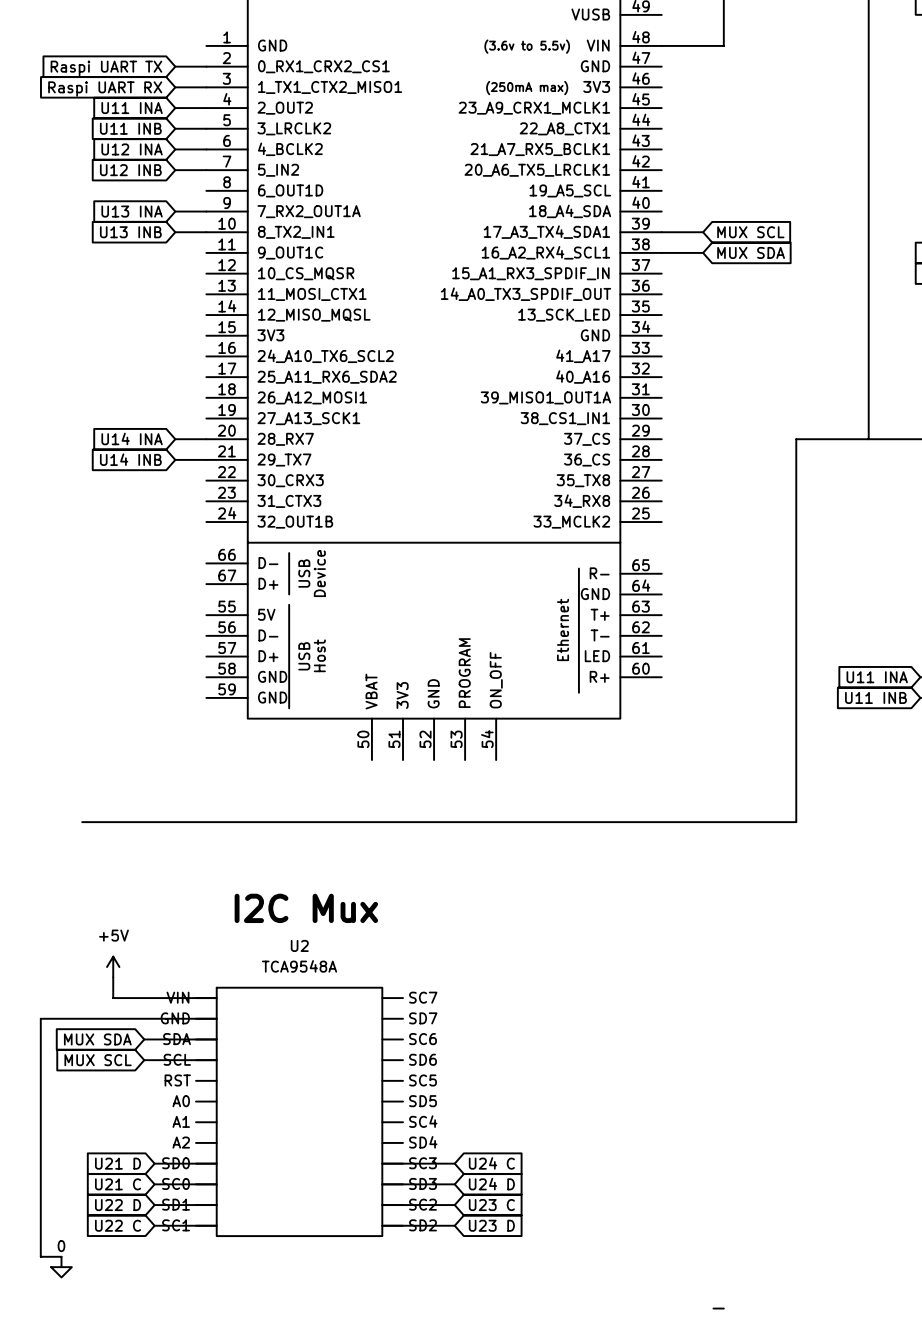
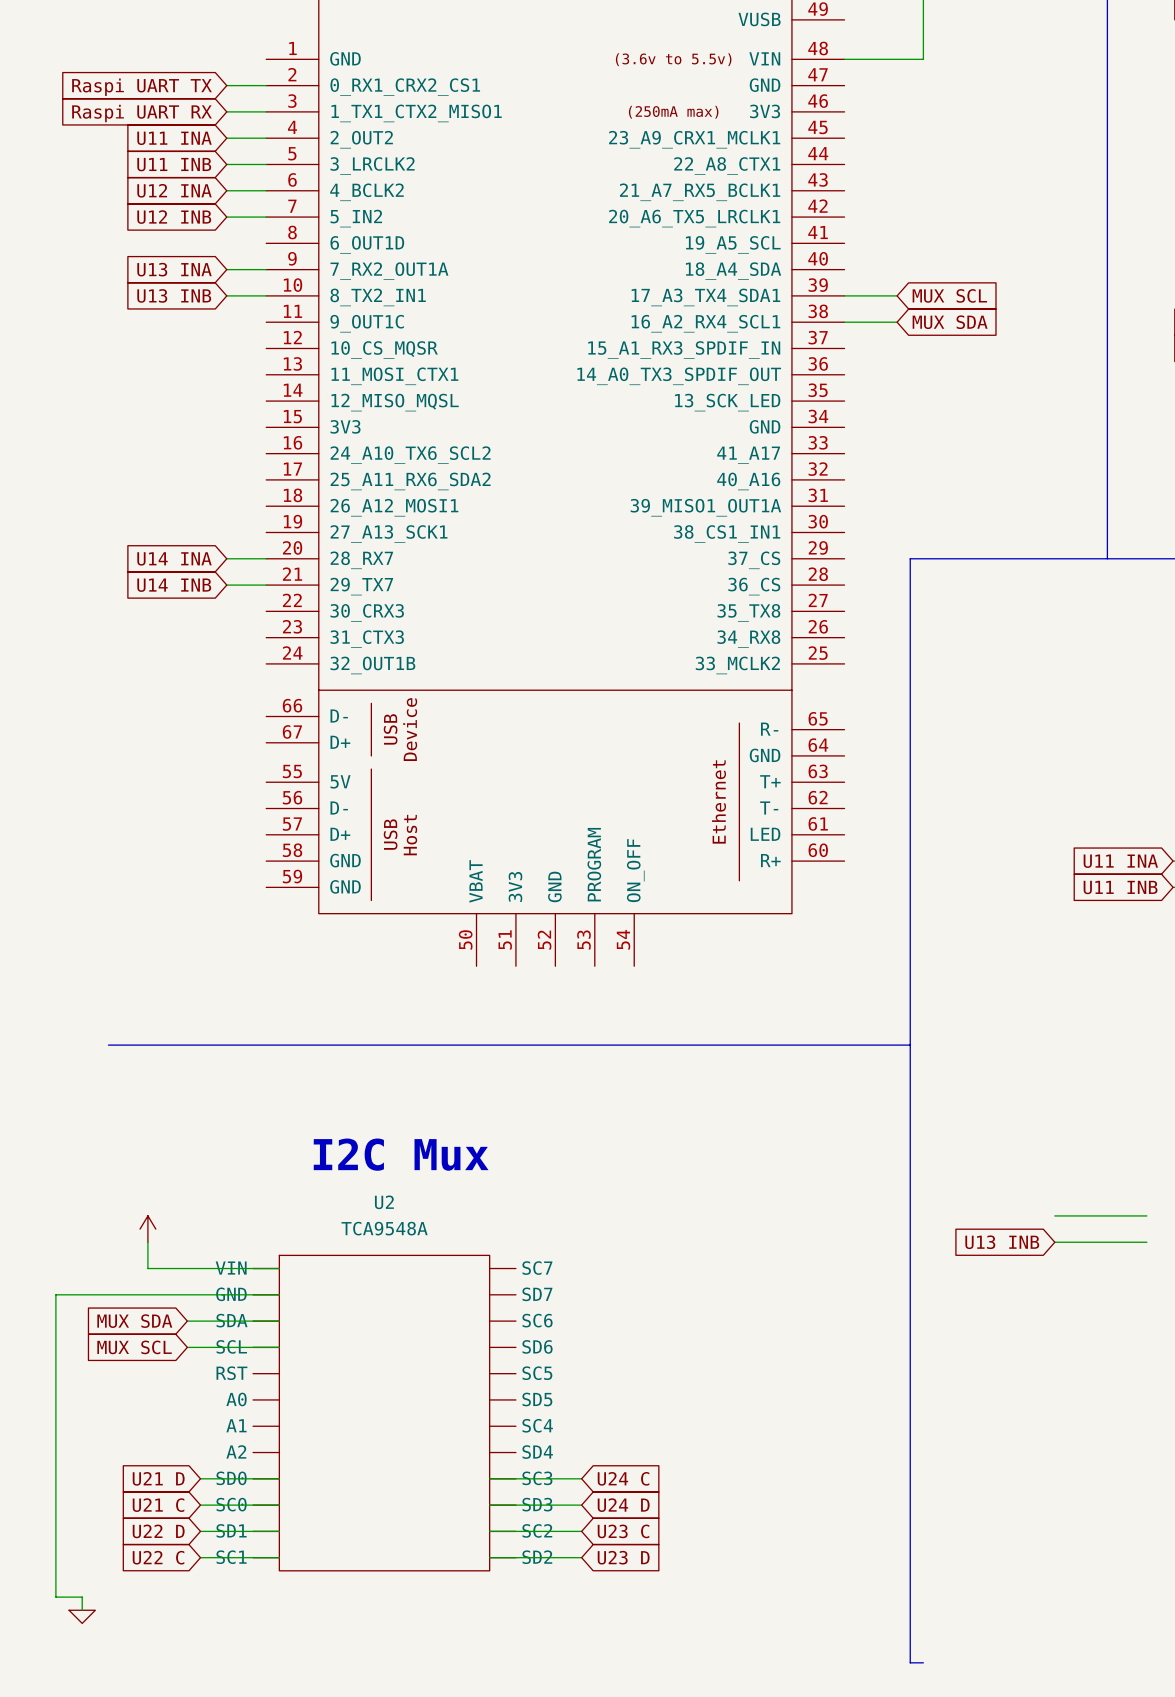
line: (796, 439) (796, 822) (713, 822) -> (1015, 558) (910, 558) (910, 1662)
power symbol text: +5V (113, 935) -> none
wire: none -> (1054, 1215) (1146, 1215)
global label: none -> U13 INB (1002, 1242)
wire: none -> (1054, 1242) (1146, 1242)
power symbol text: 0 (61, 1246) -> none

